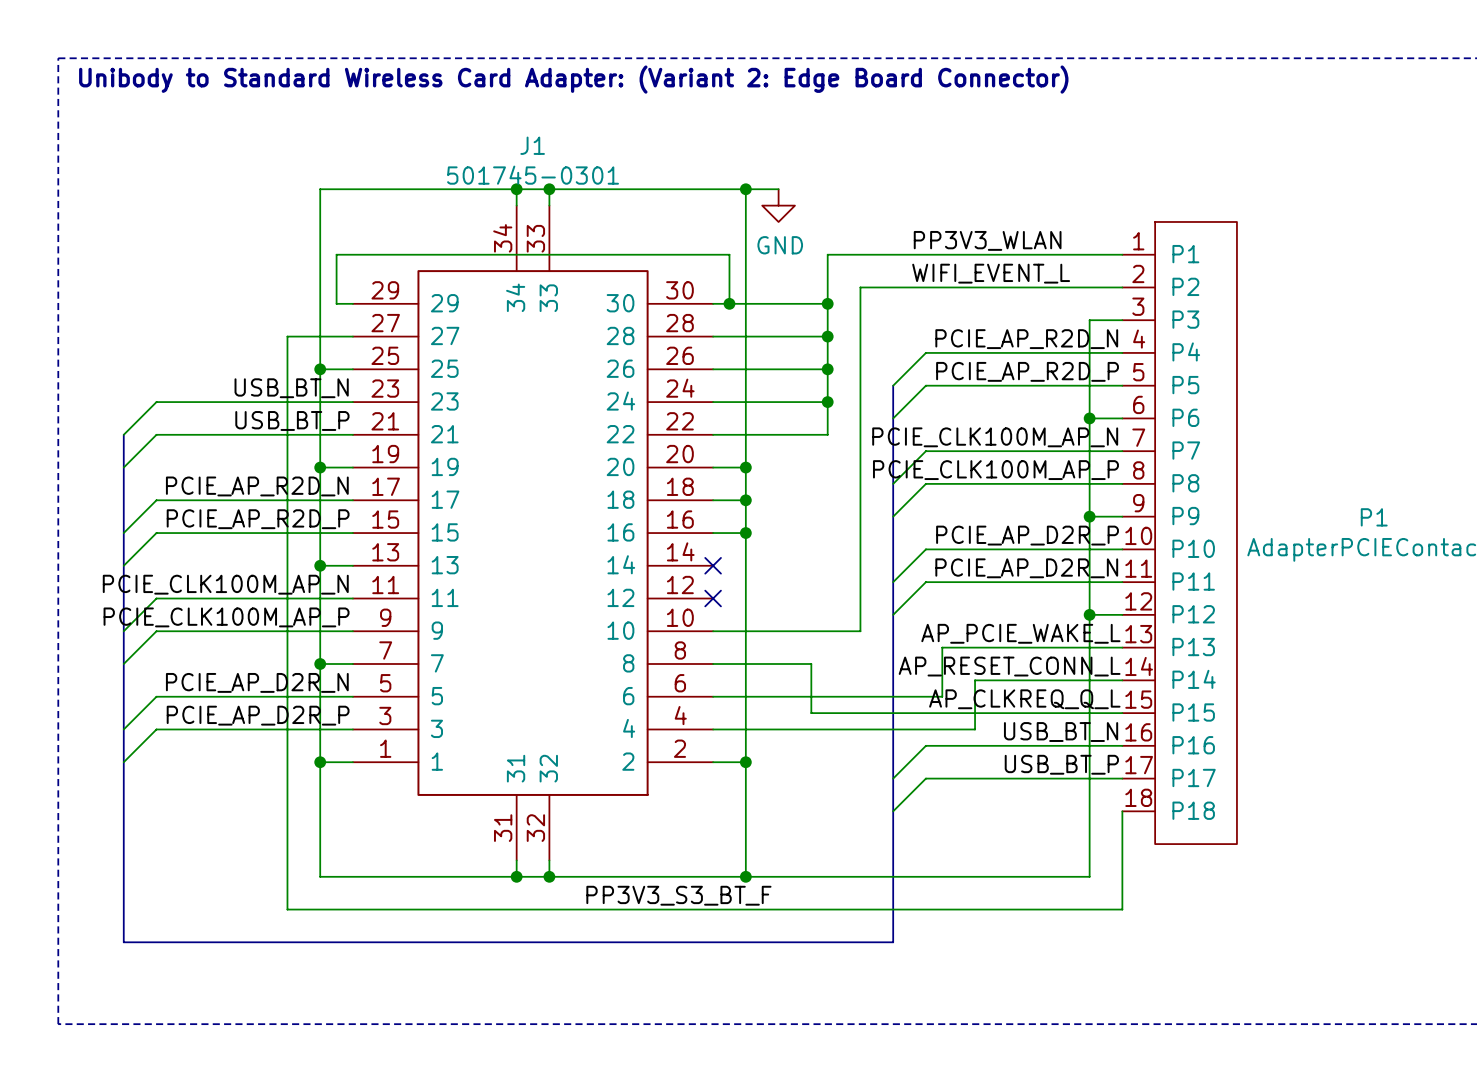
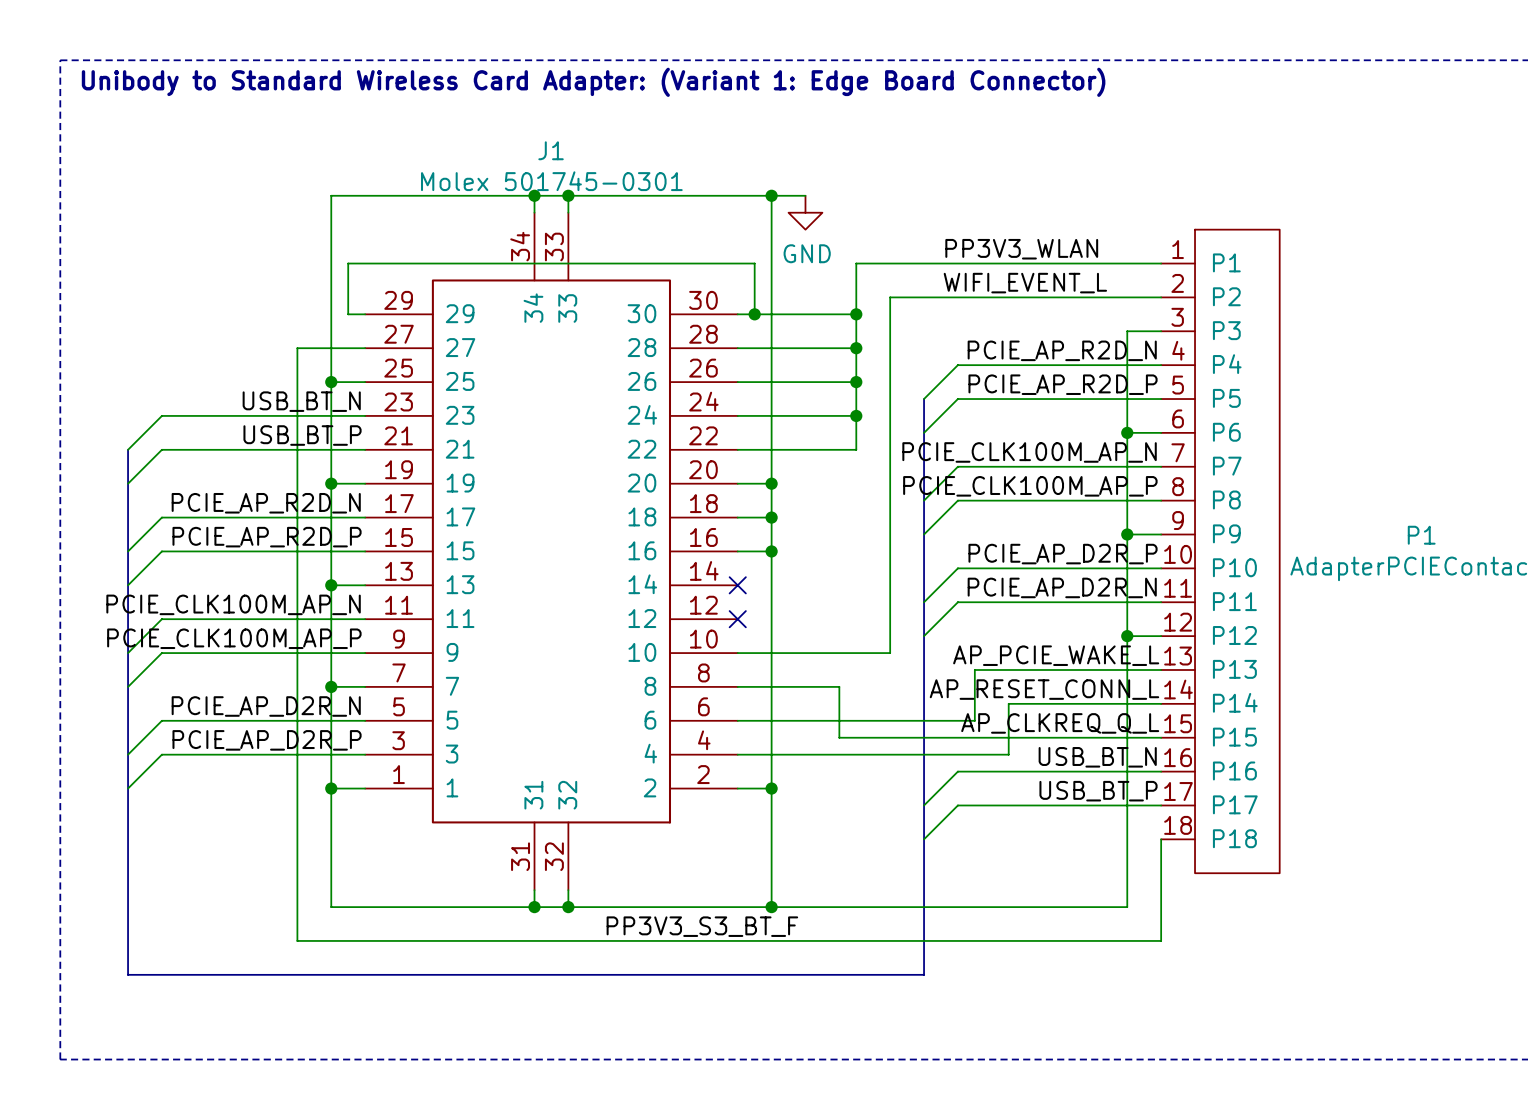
text: Unibody to Standard Wireless Card Adapter: (Variant 2: Edge Board Connector) (573, 79) -> Unibody to Standard Wireless Card Adapter: (Variant 1: Edge Board Connector) (593, 82)
J1 value: 501745-0301 (533, 175) -> Molex 501745-0301 (551, 181)

